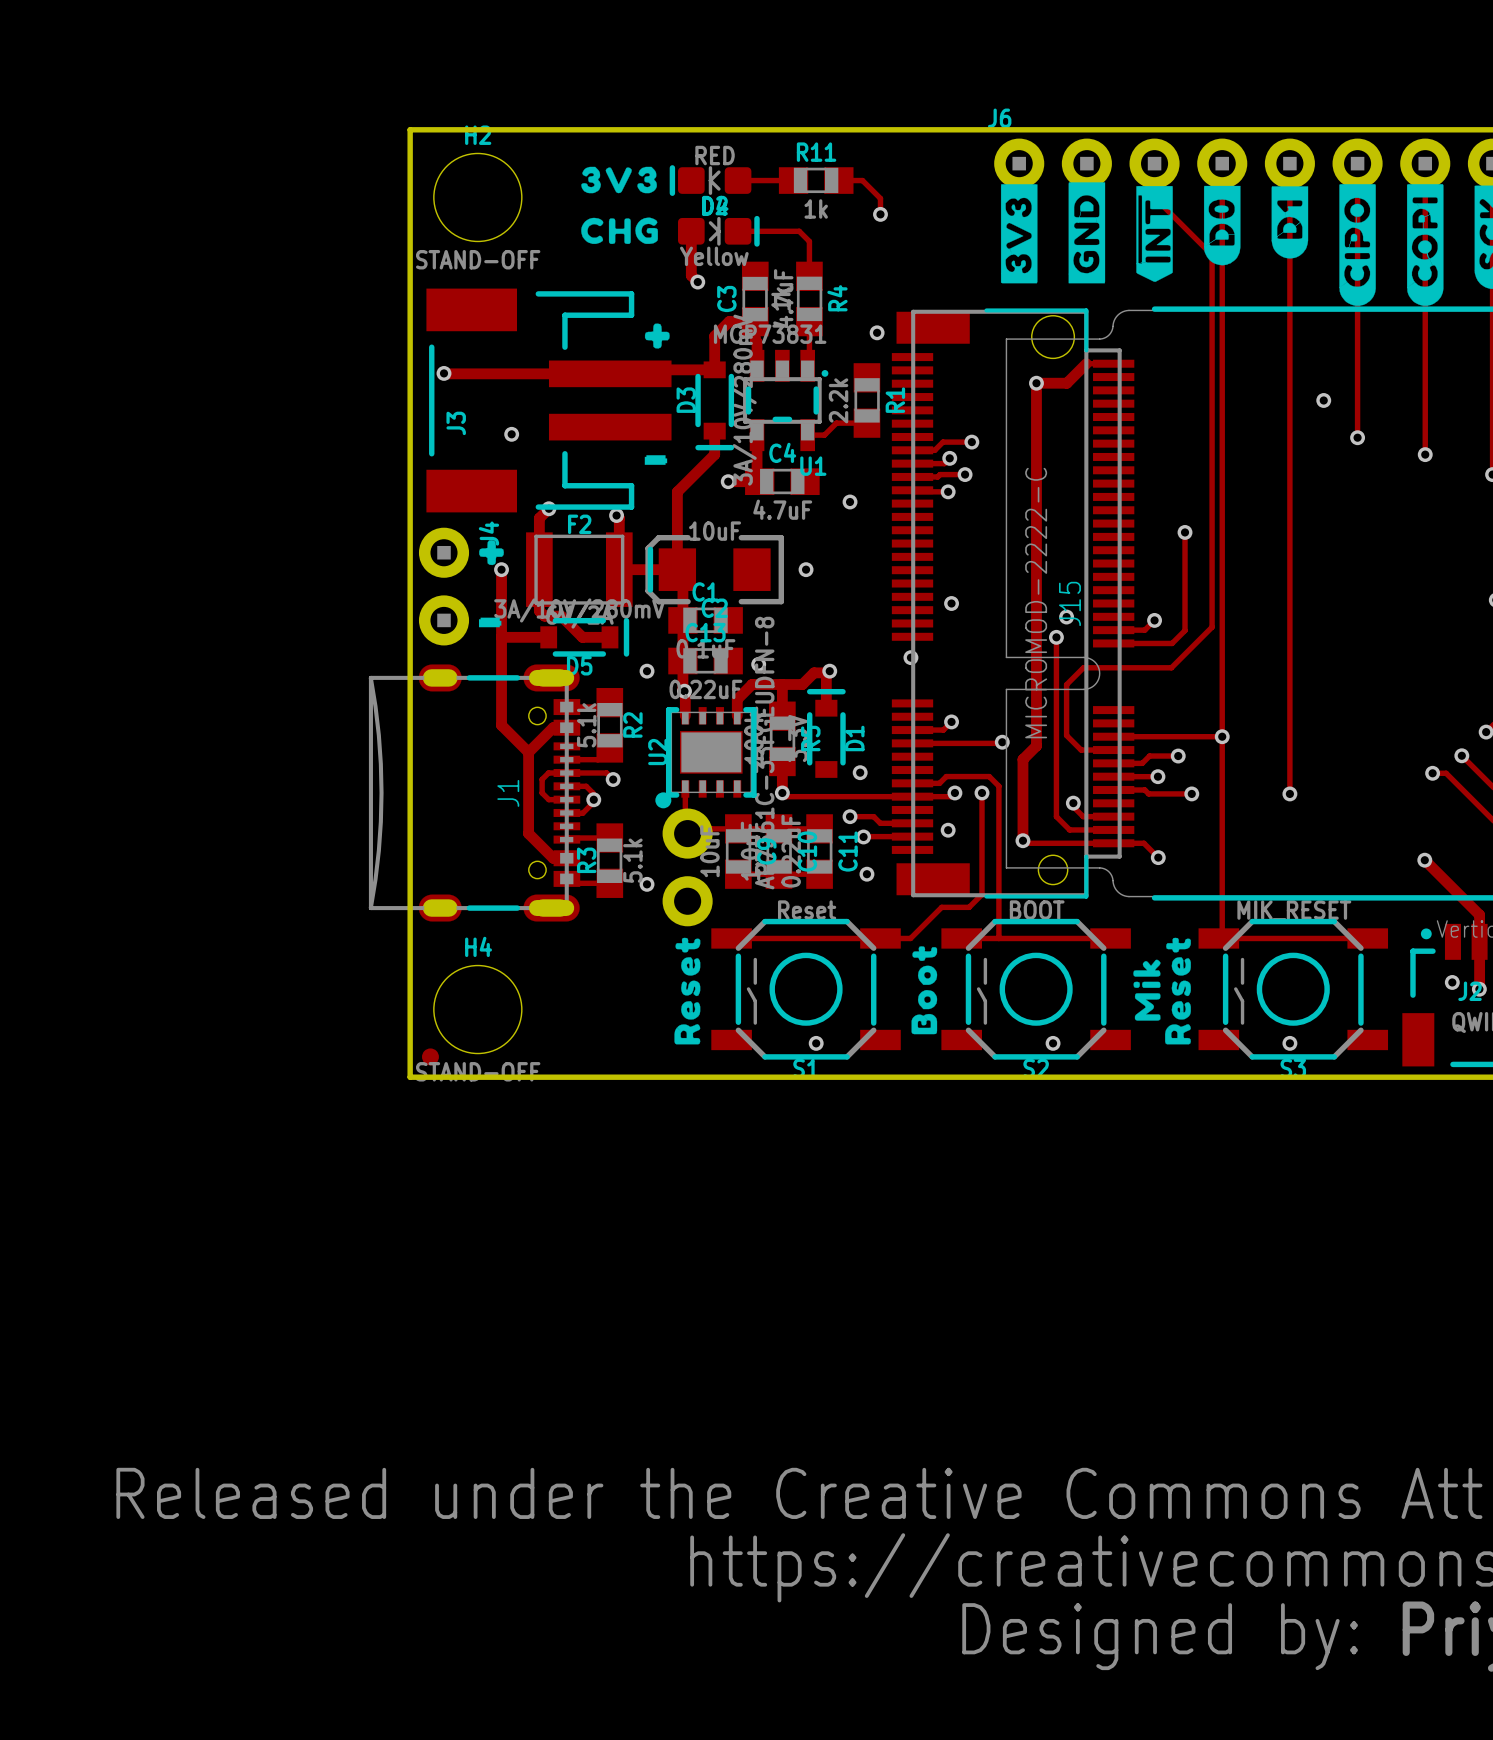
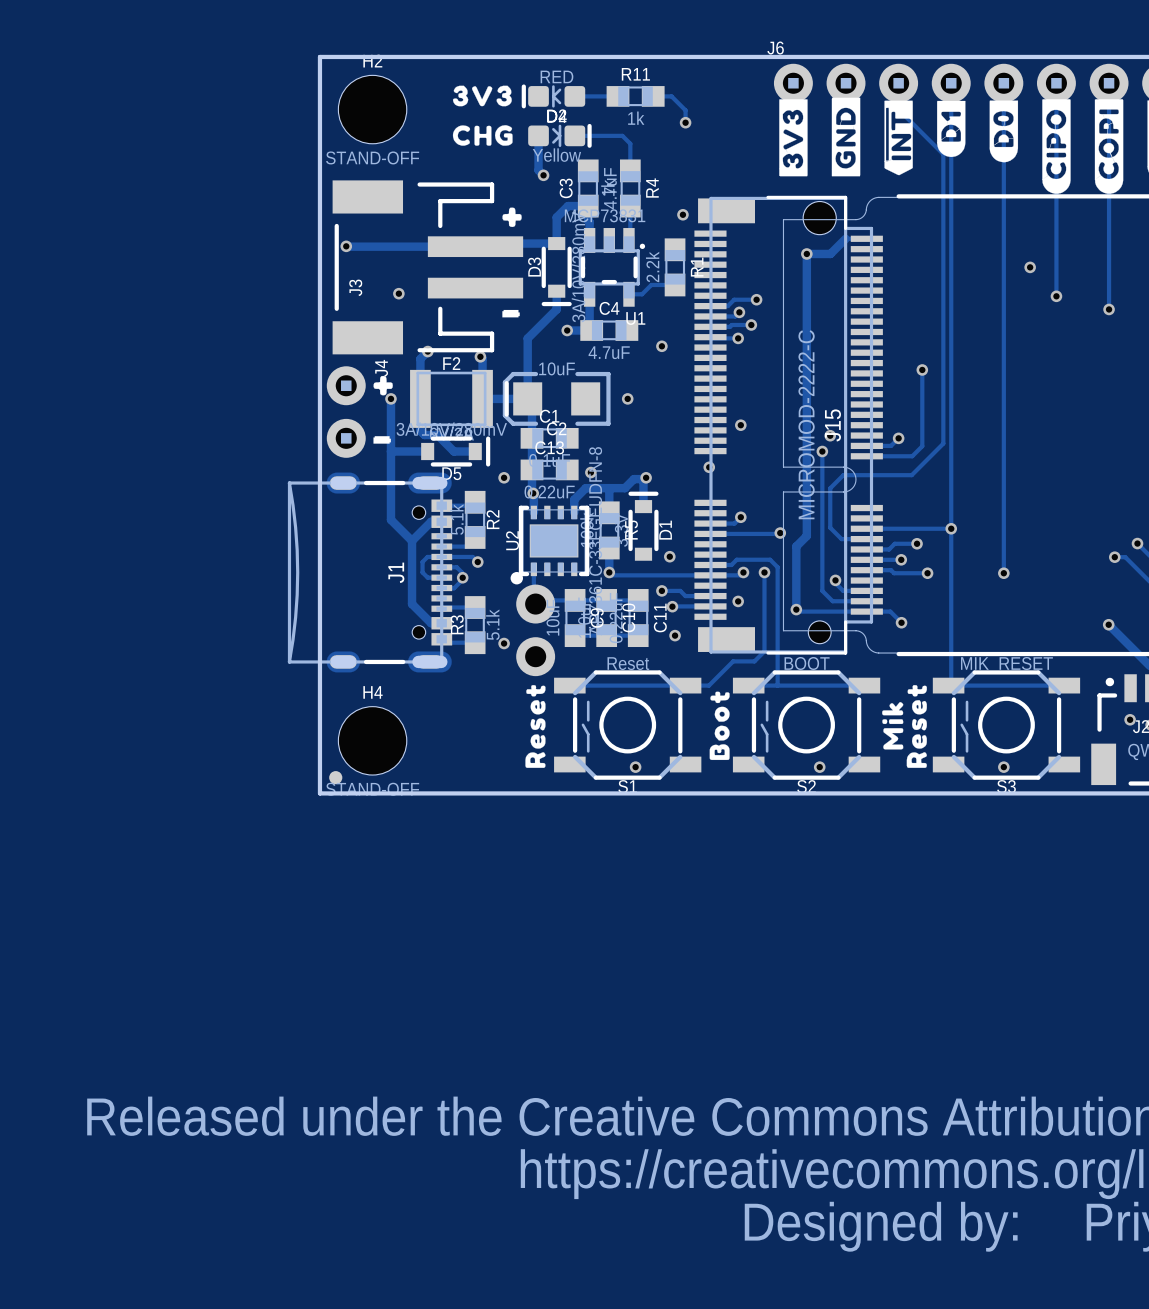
drawing position: (1289, 222) -> (951, 128)
drawing position: (1222, 225) -> (1003, 131)

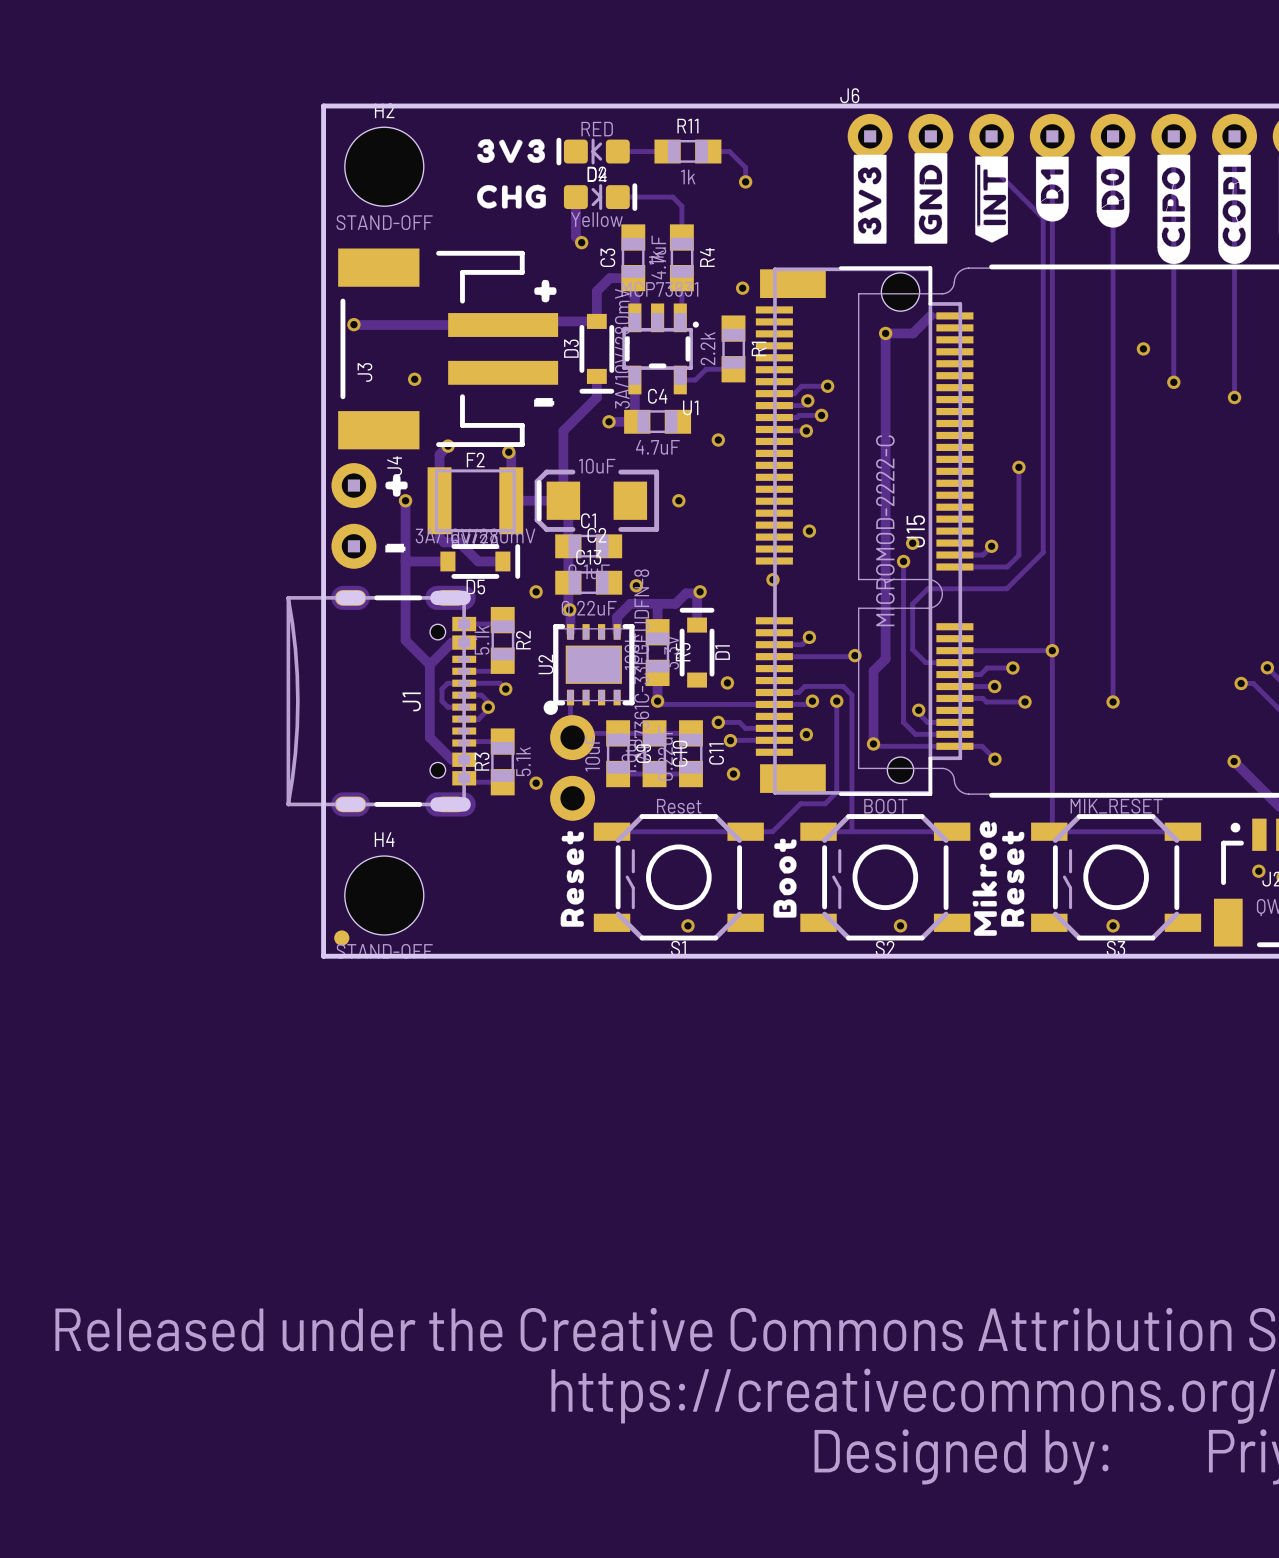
drawing shape: [882, 702, 904, 750] -> [972, 821, 997, 936]

